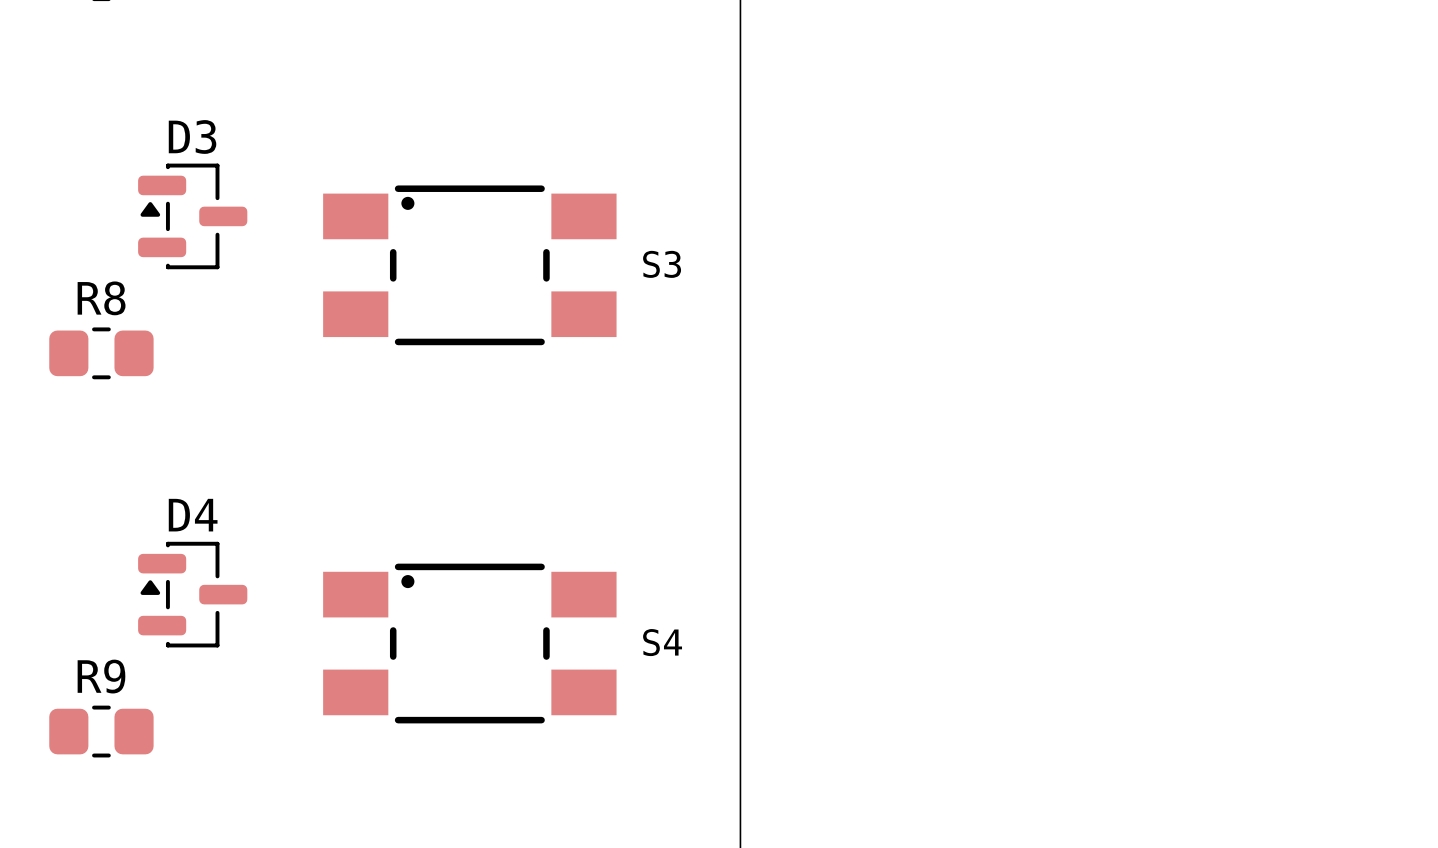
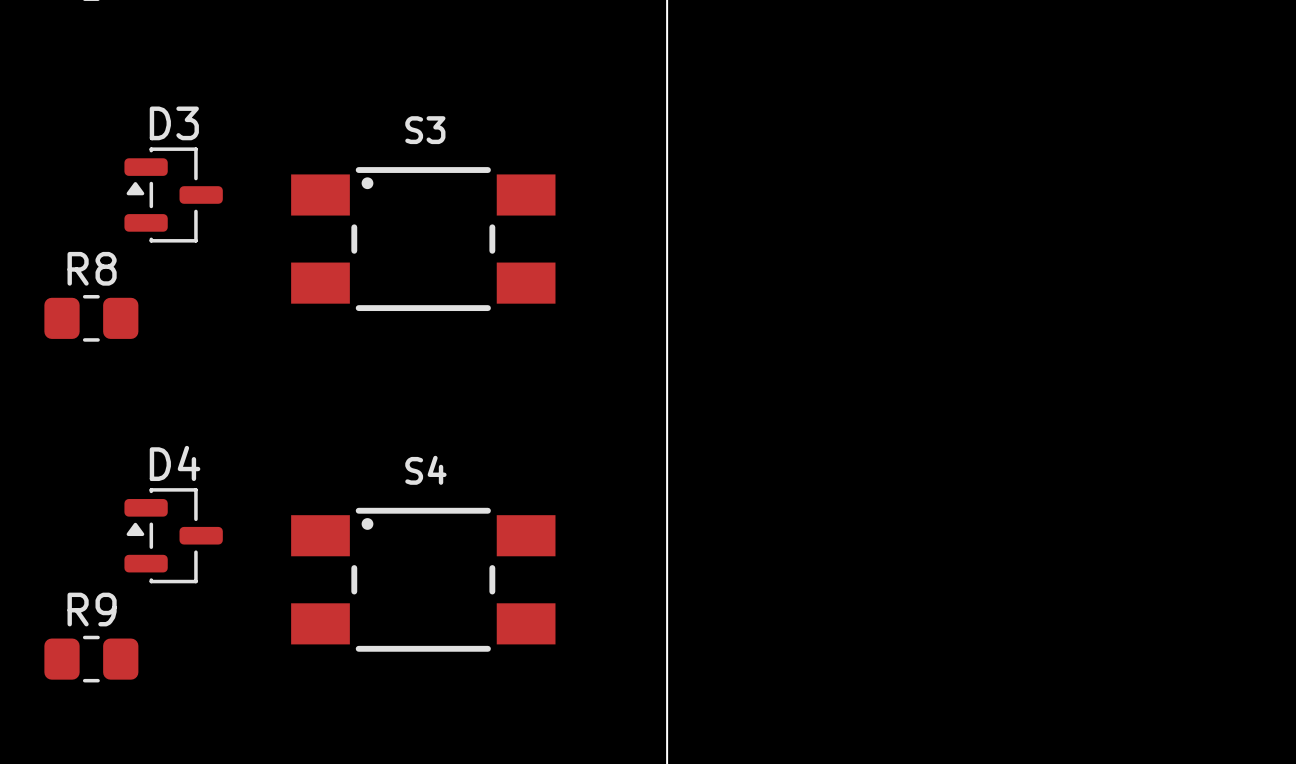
S3 name position: S3 (662, 264) -> S3 (425, 130)
S4 name position: S4 (662, 642) -> S4 (425, 470)

